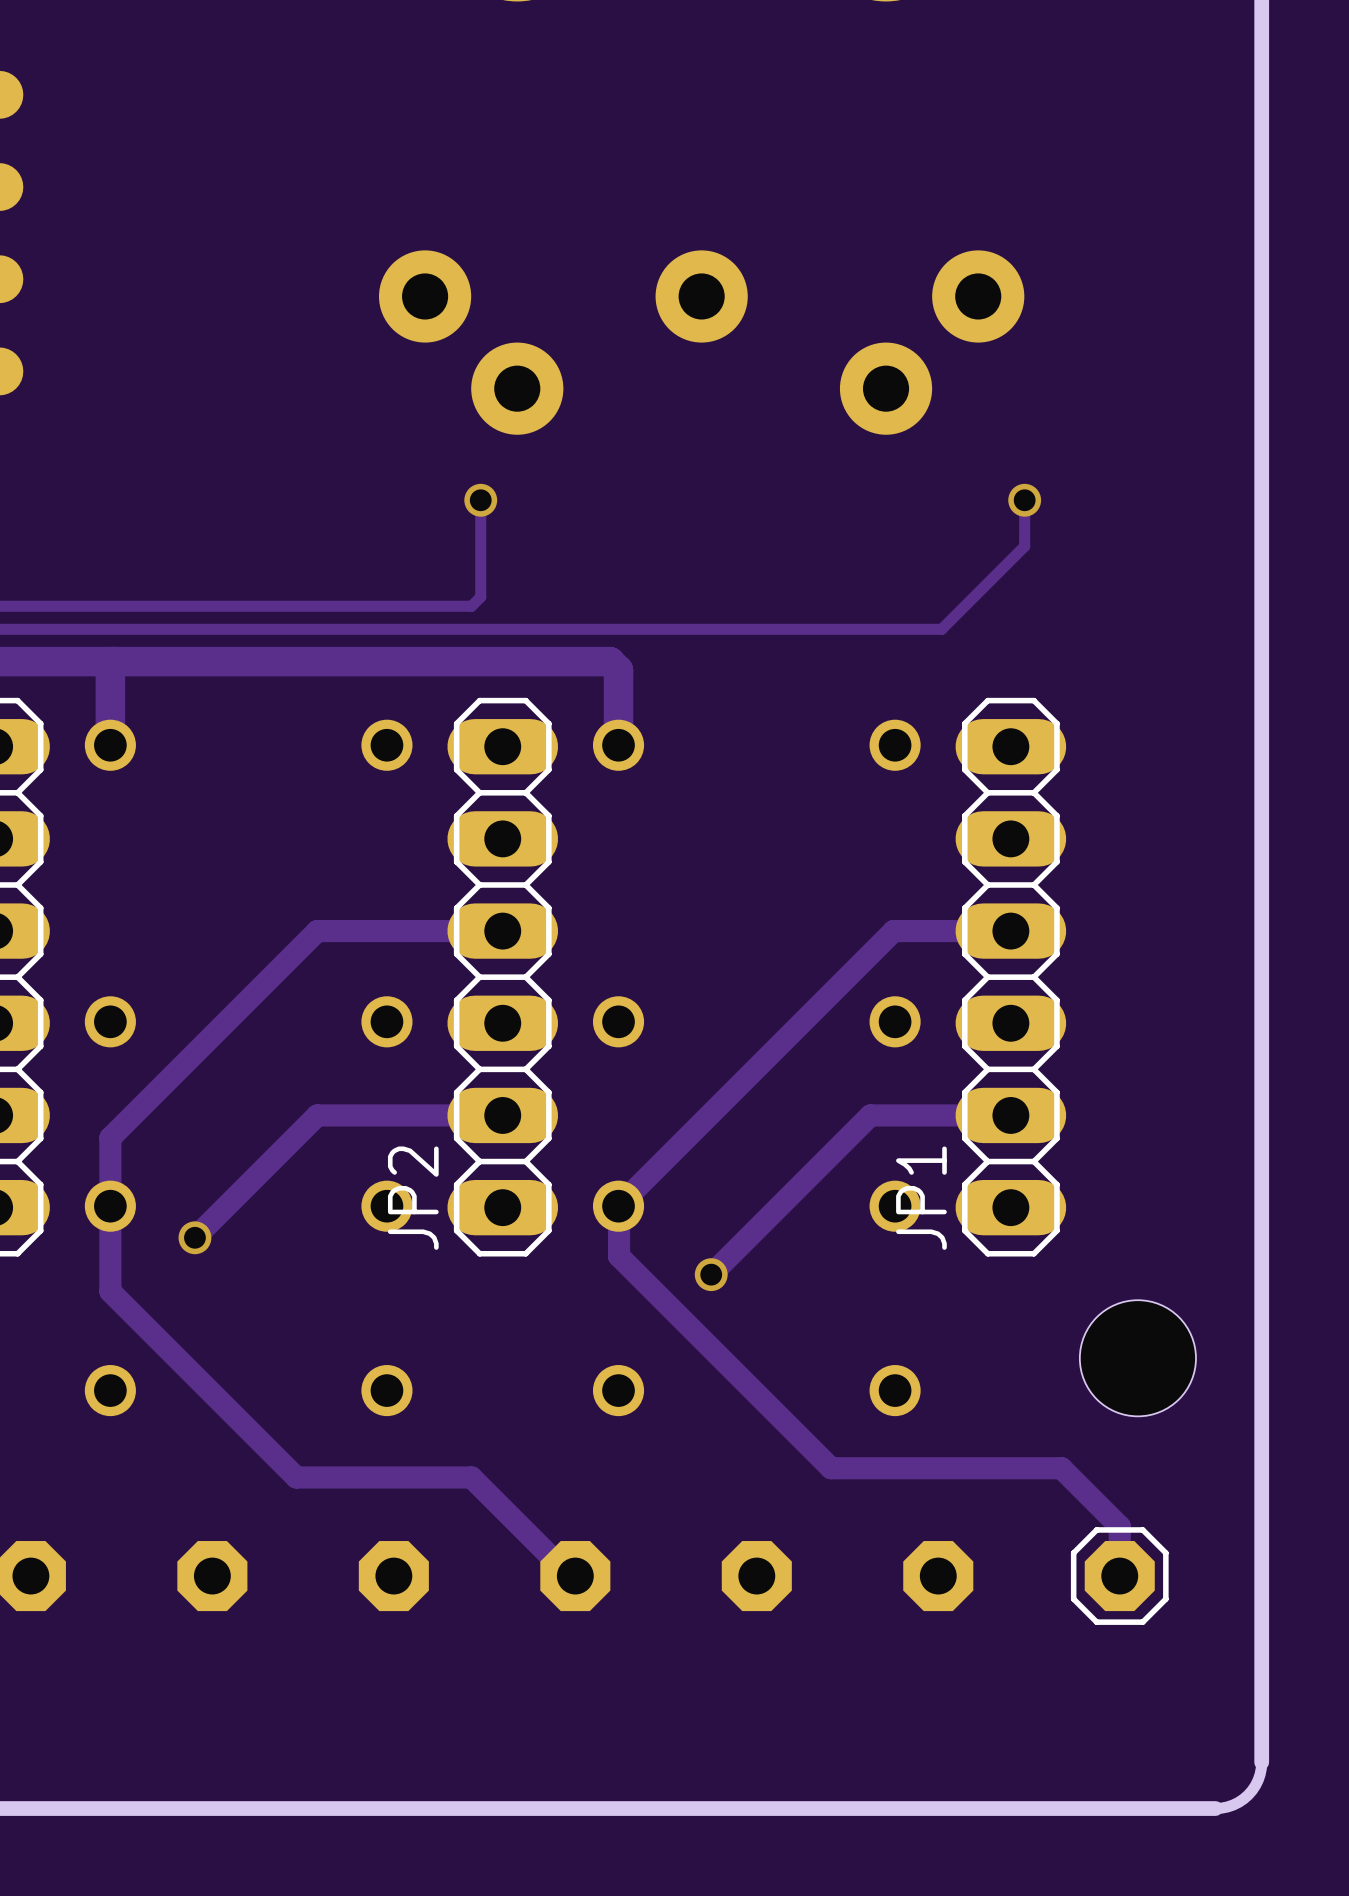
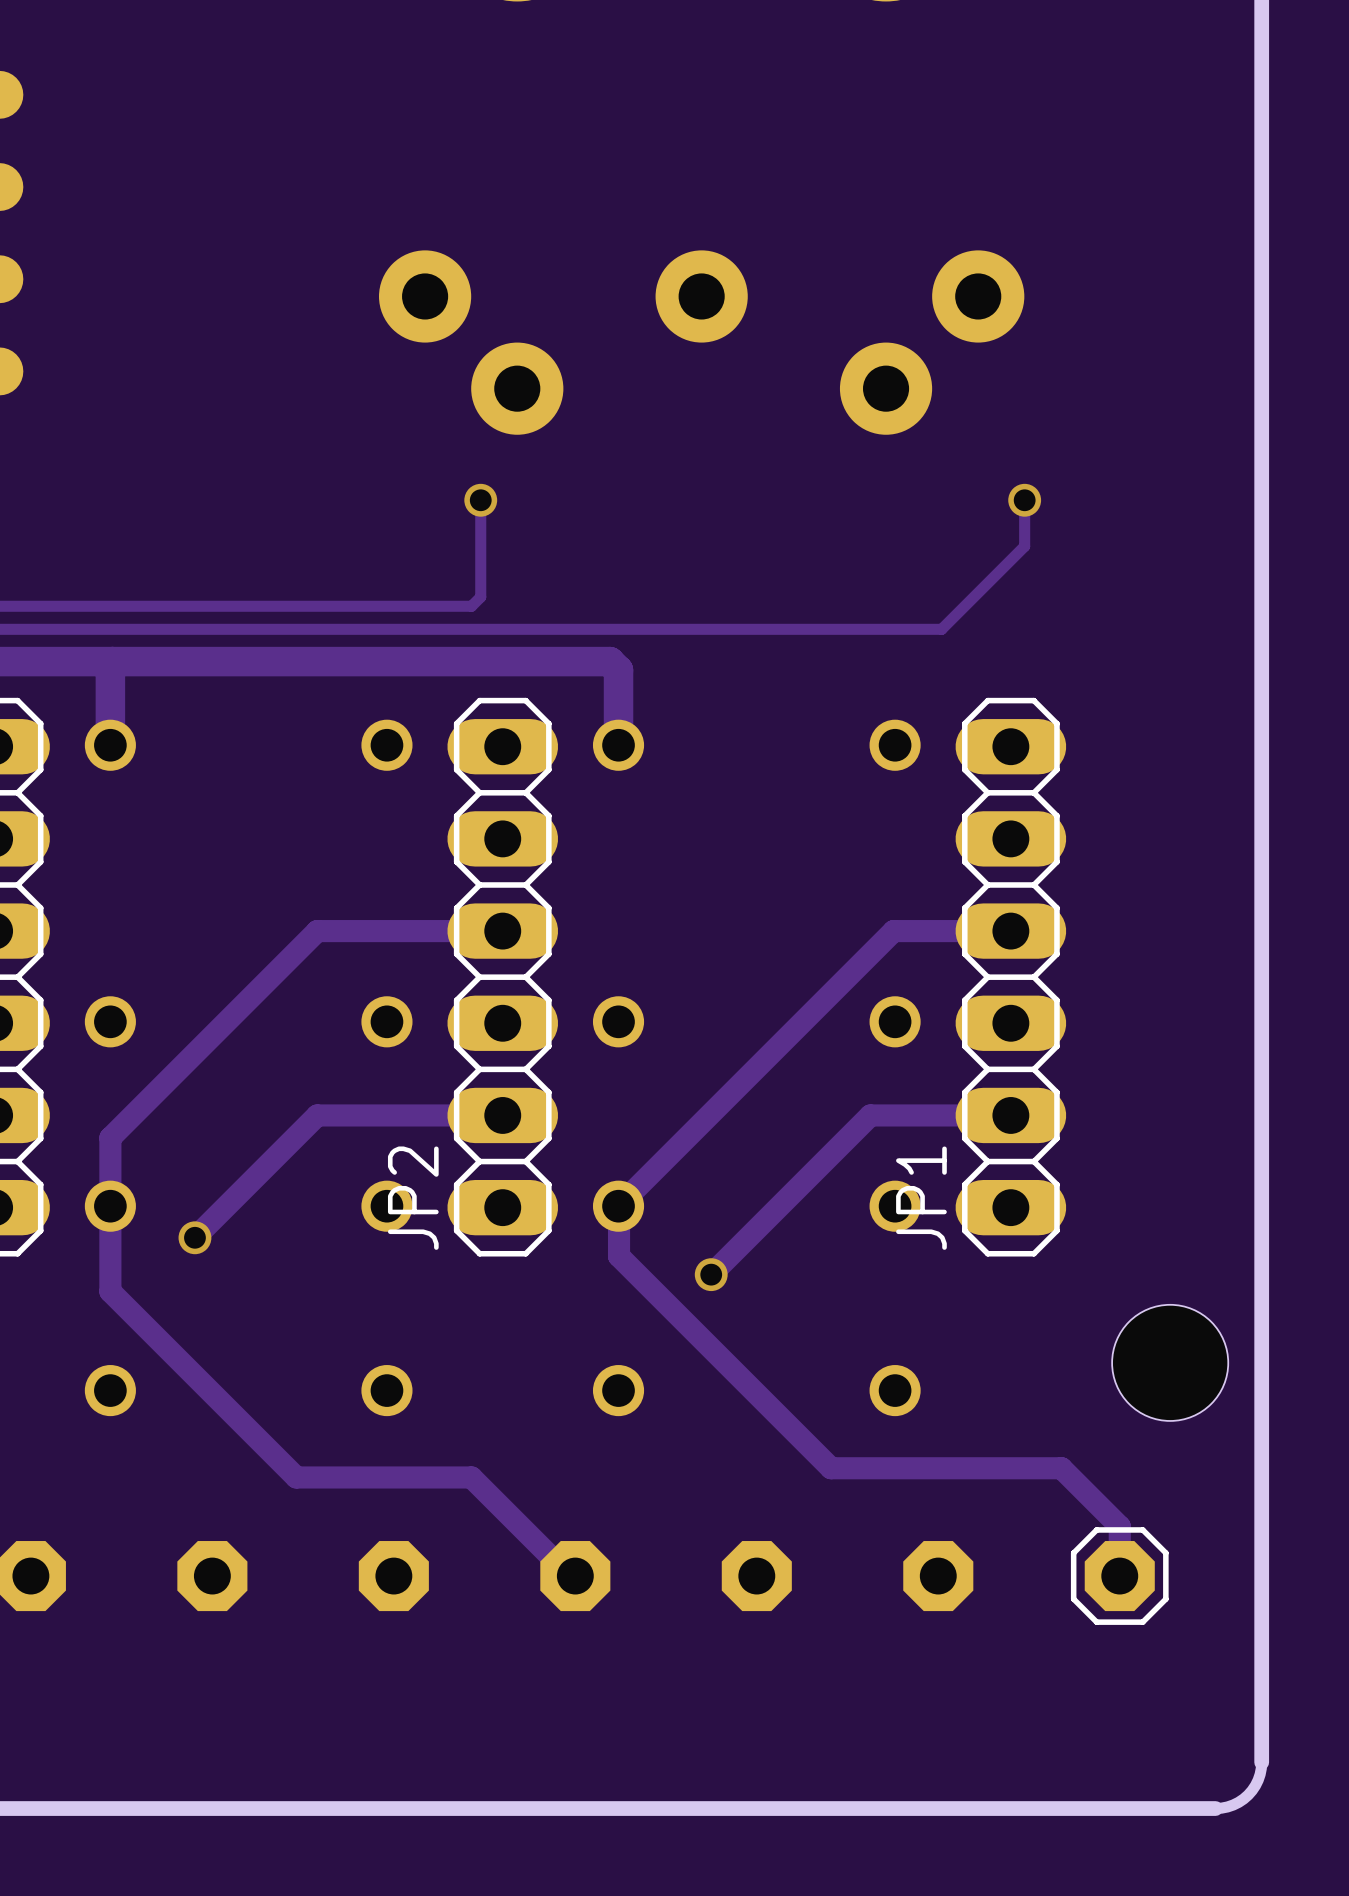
hole position: (1137, 1358) -> (1170, 1362)

